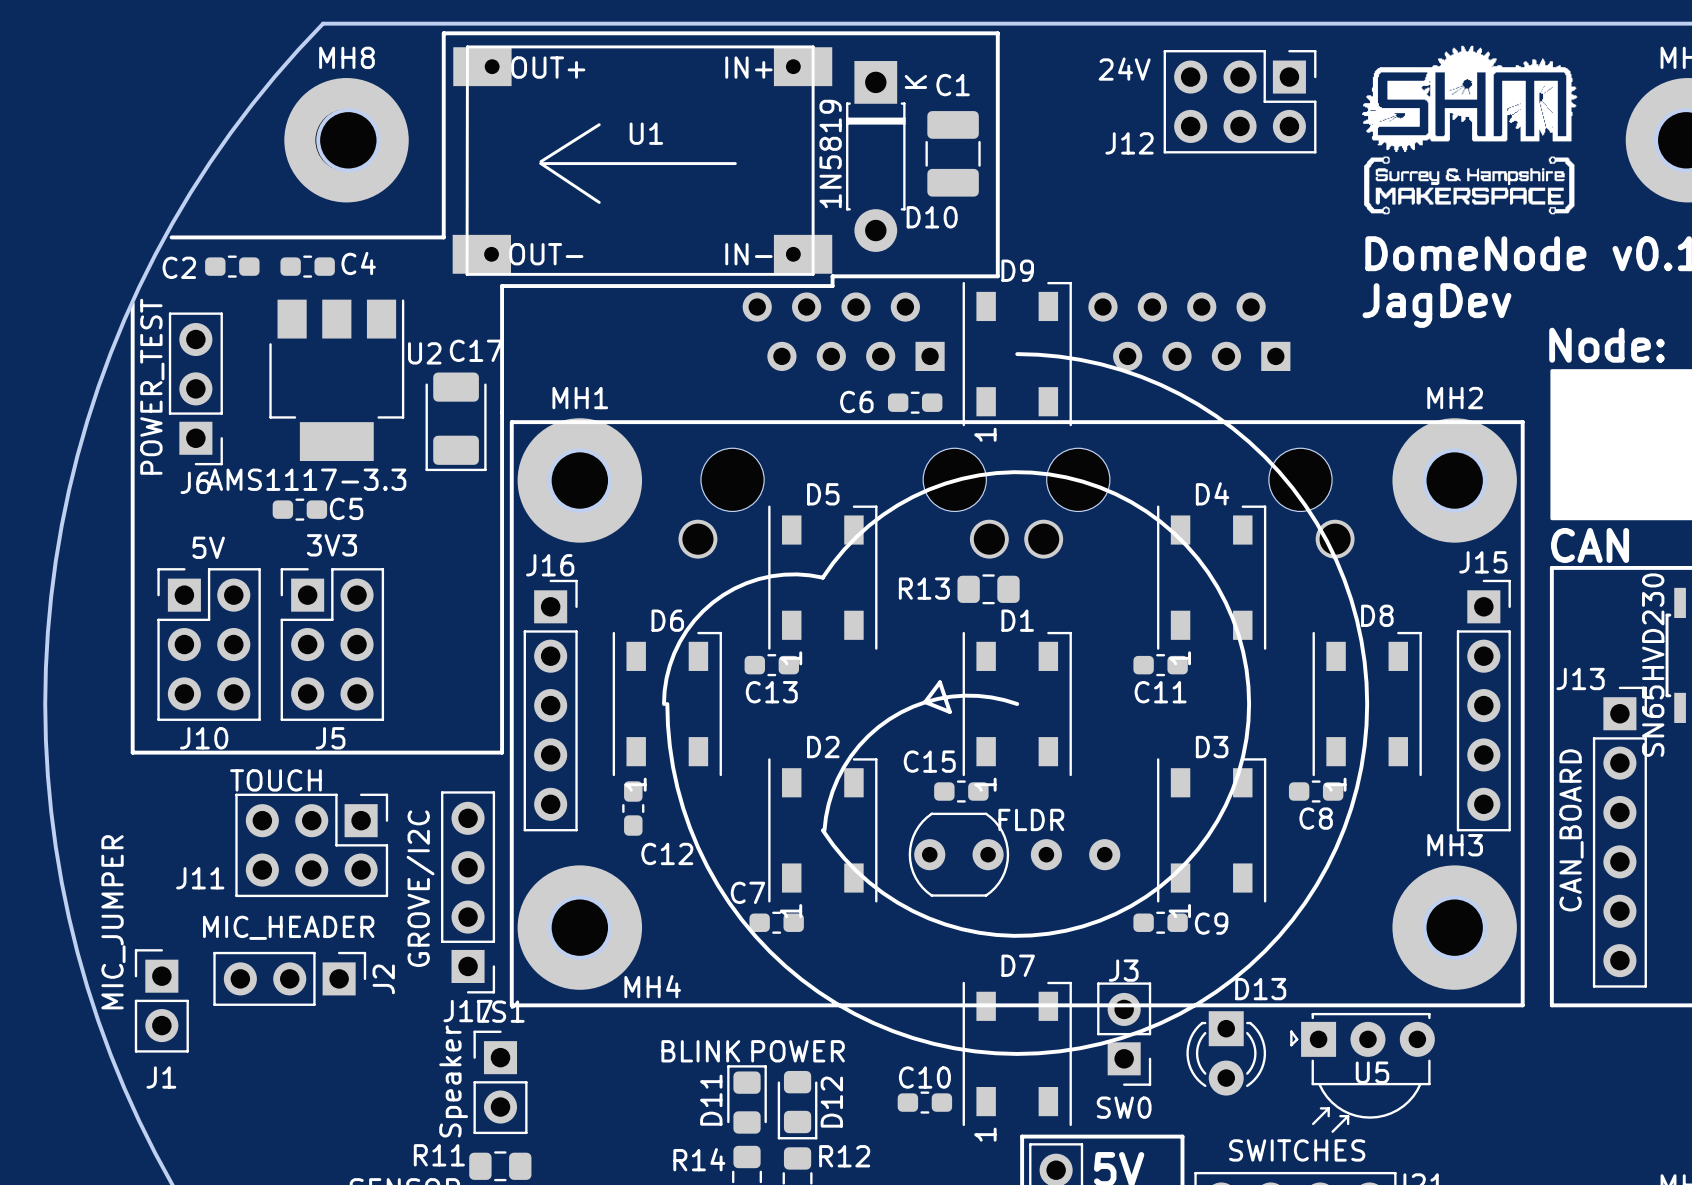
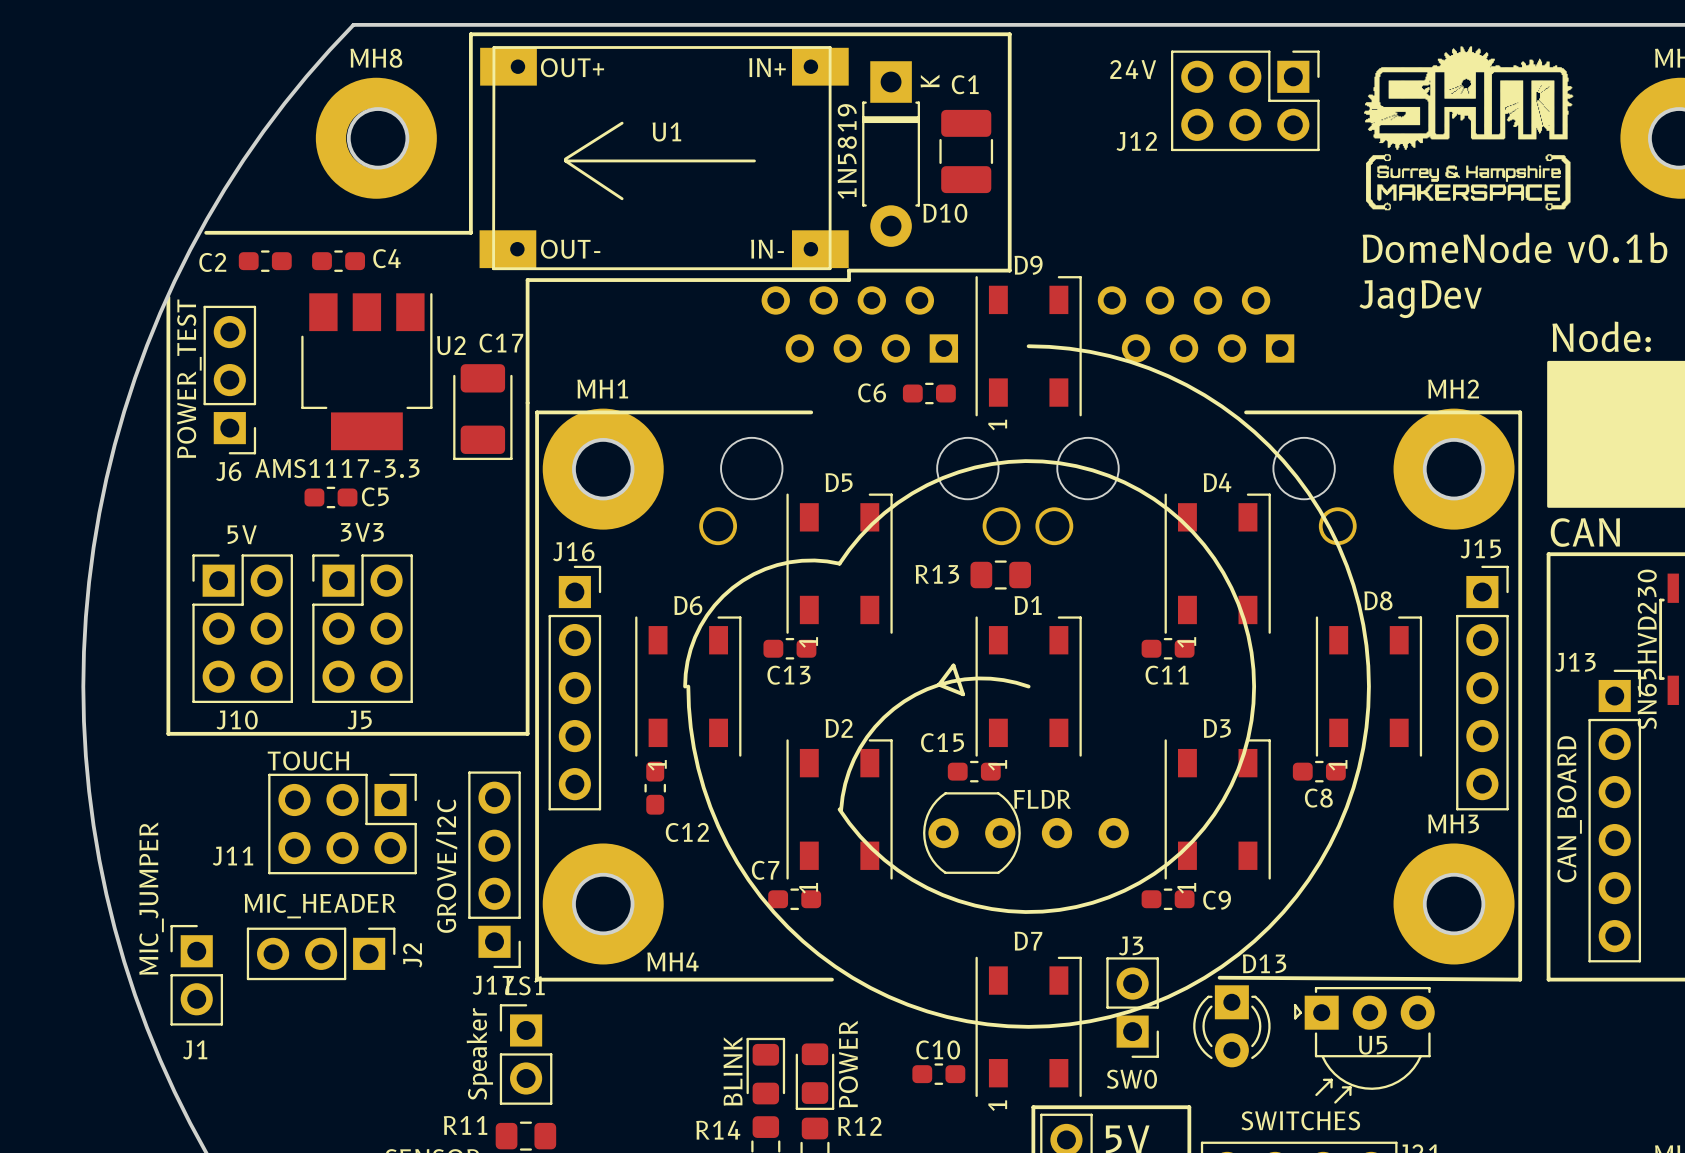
line: (793, 422) (1240, 422) -> none
line: (815, 1005) (1522, 1005) -> (1219, 977) (1520, 979)
D12 value rotation: 0° (700, 1051) -> 90° counterclockwise (732, 1071)
D11 value rotation: 0° (798, 1051) -> 90° counterclockwise (848, 1064)
D11 name: D11 (711, 1100) -> none
D12 name: D12 (831, 1102) -> none

